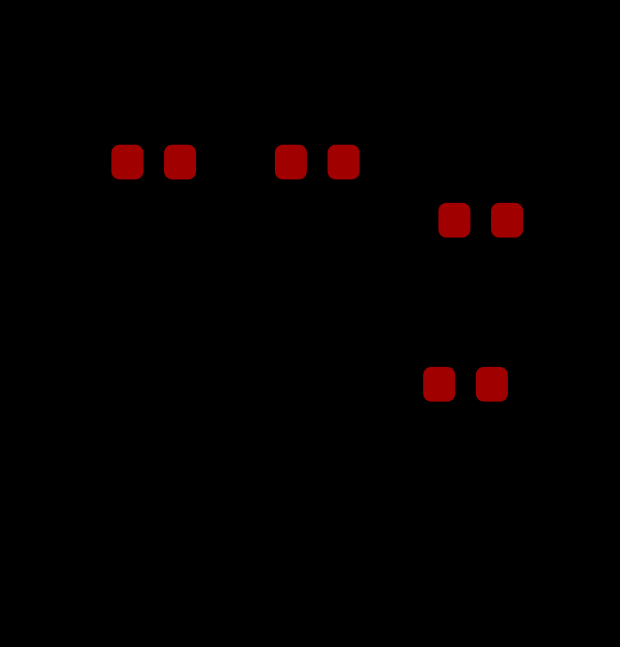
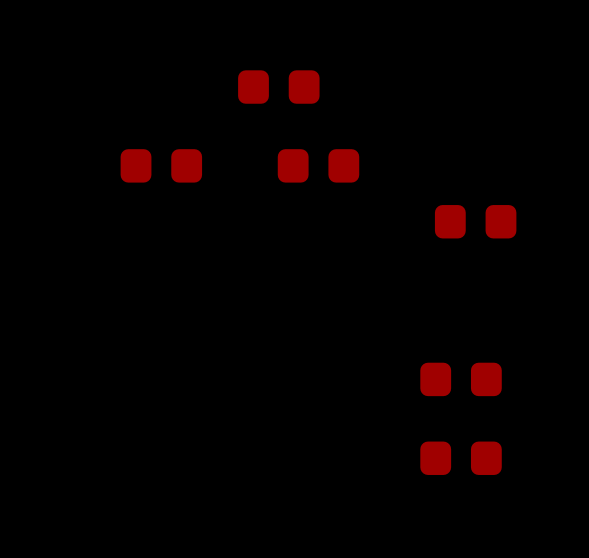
part: none -> (278, 87)
part: none -> (461, 458)

